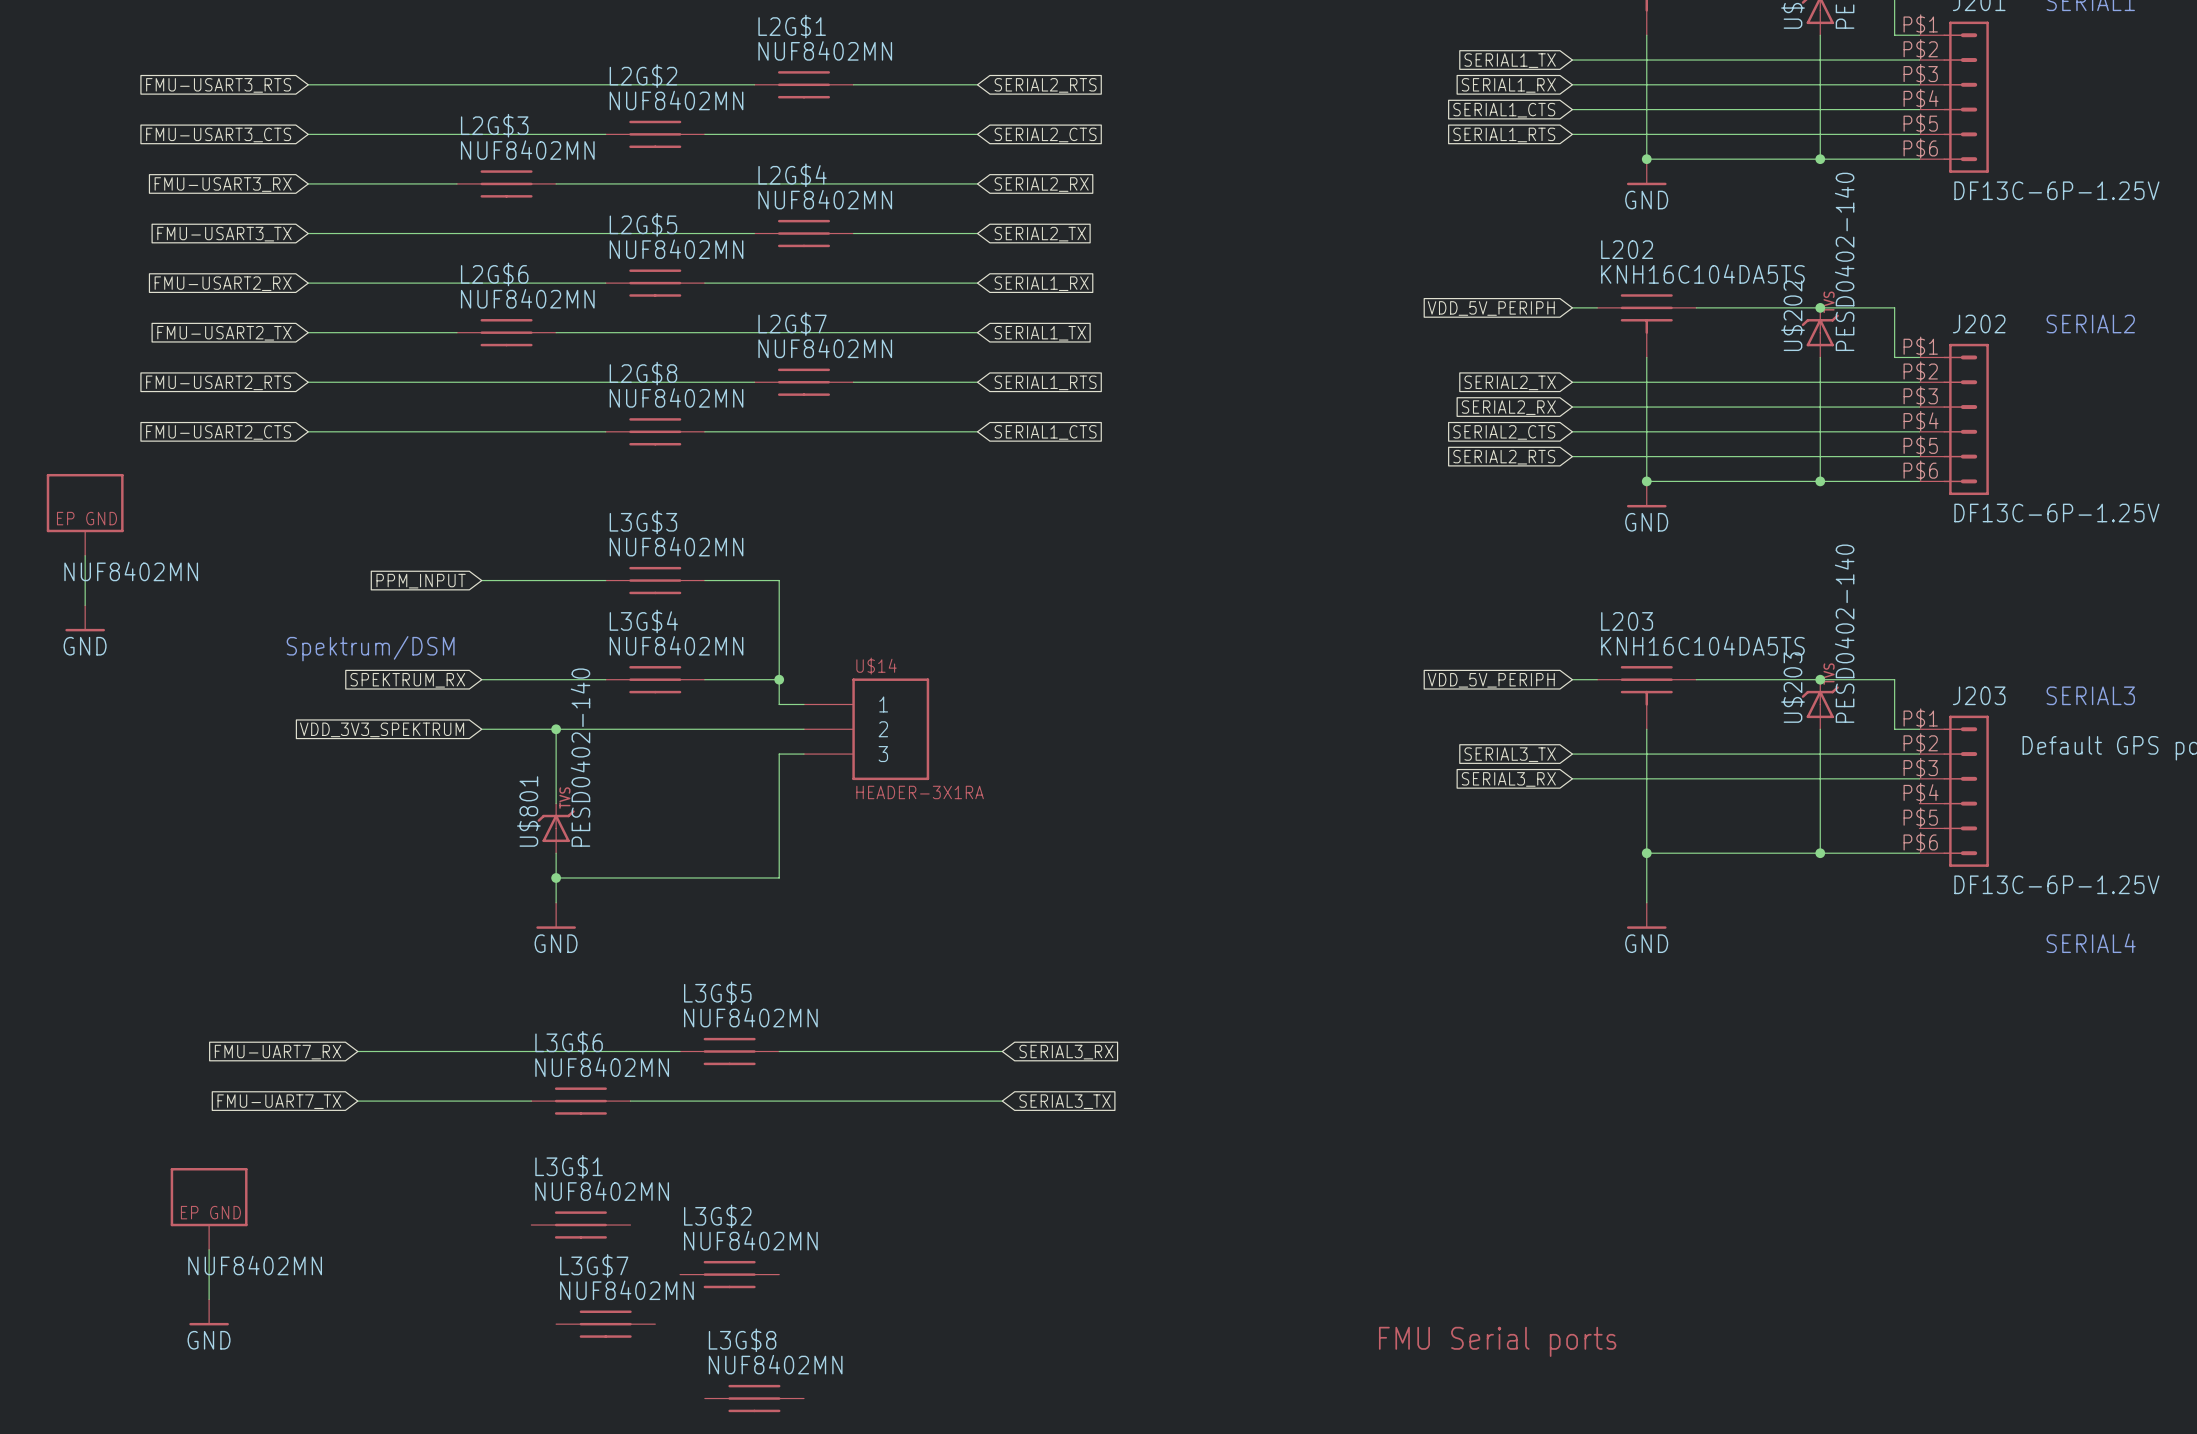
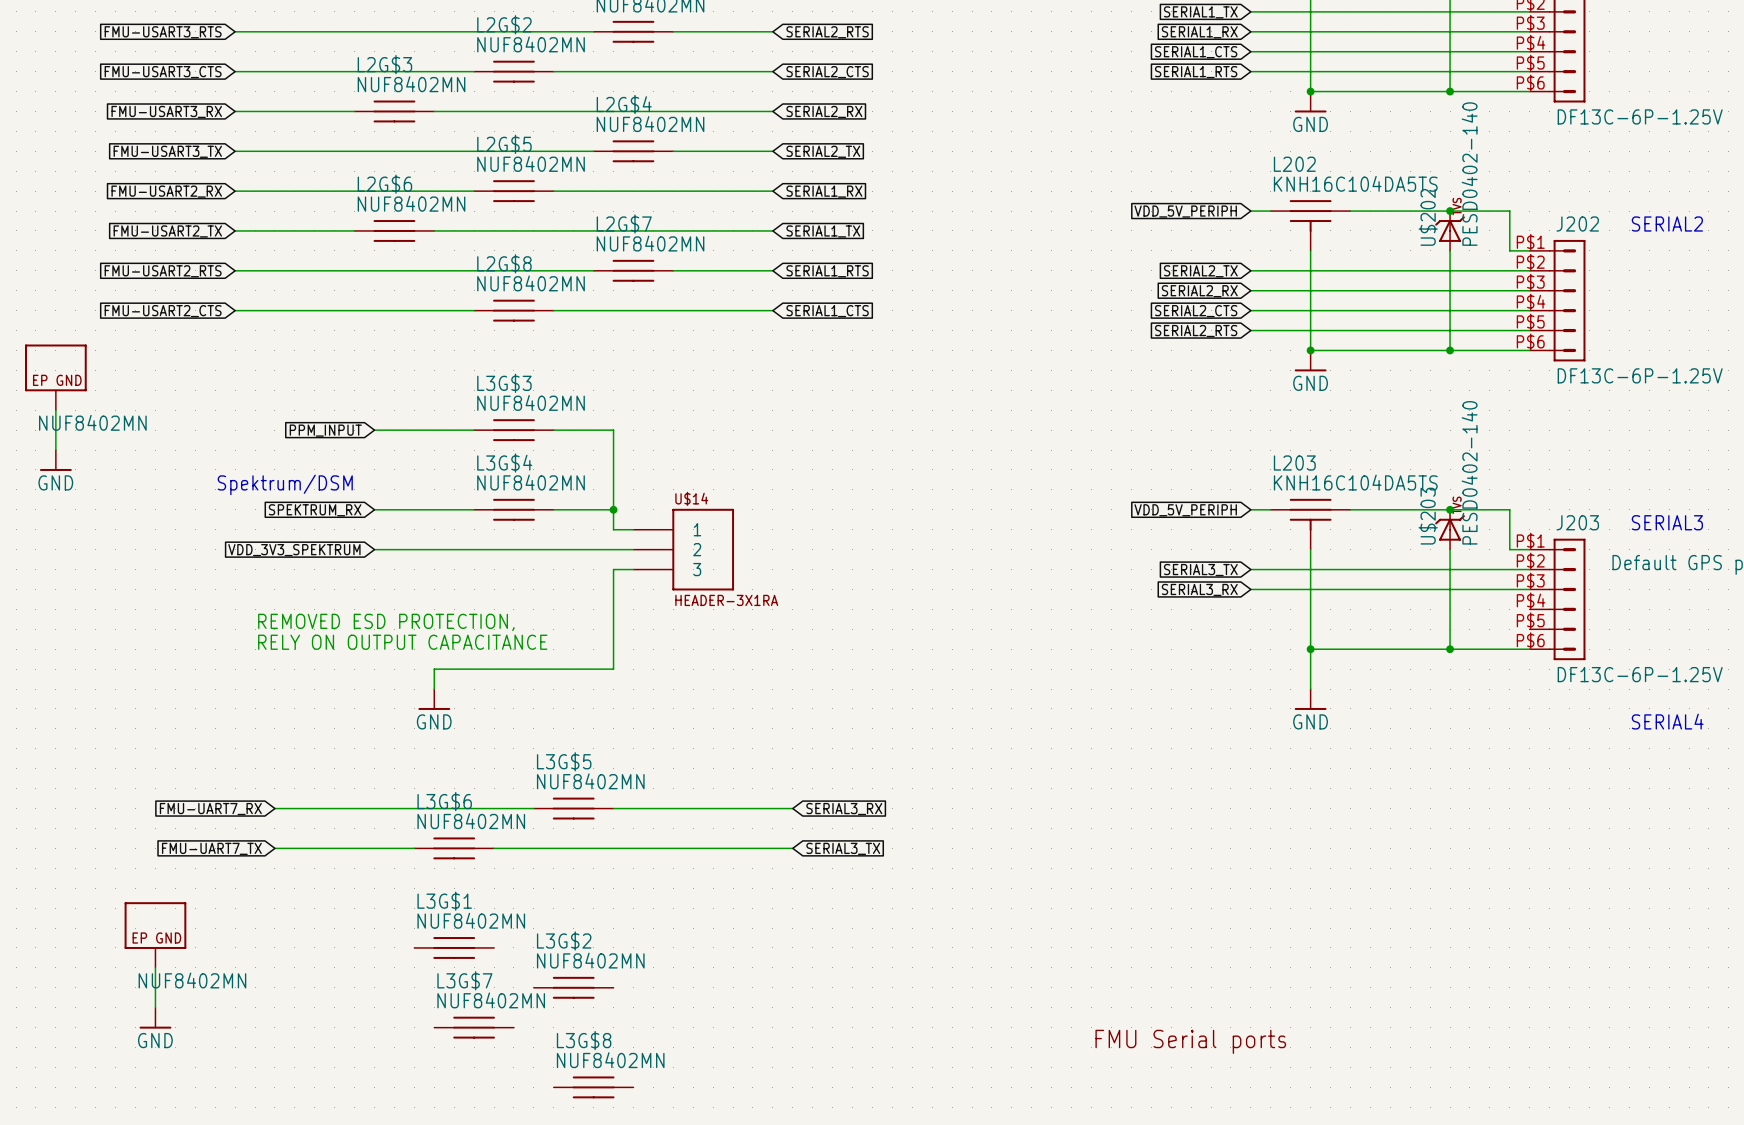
wire: (556, 729) (556, 803) -> none
junction: (556, 729) -> none
text: none -> REMOVED ESD PROTECTION, (386, 622)
U$801: PESD0402-140 (556, 828) -> none
text: none -> RELY ON OUTPUT CAPACITANCE (402, 642)
wire: (556, 853) (556, 877) -> none
junction: (556, 877) -> none

